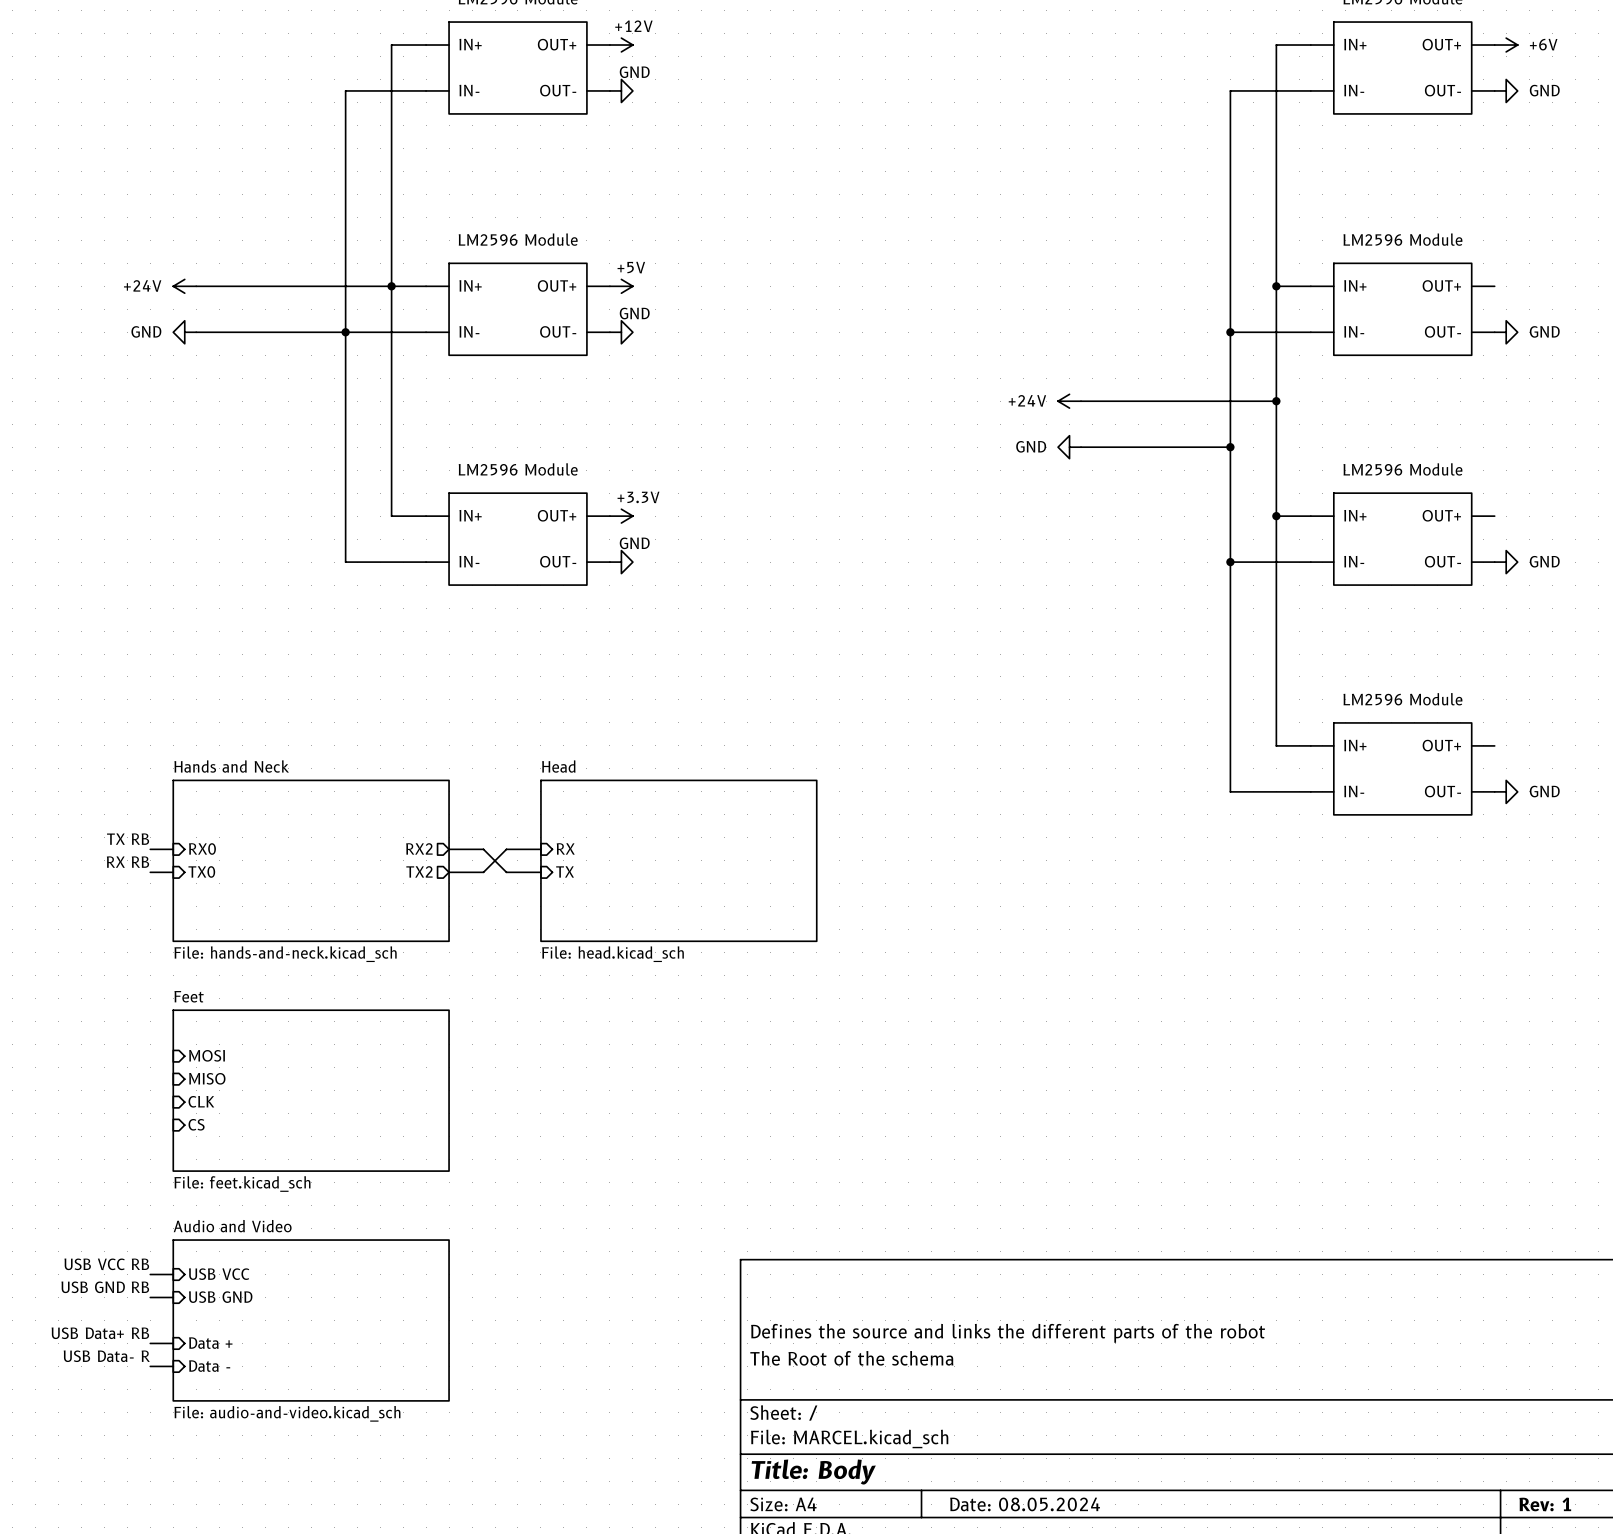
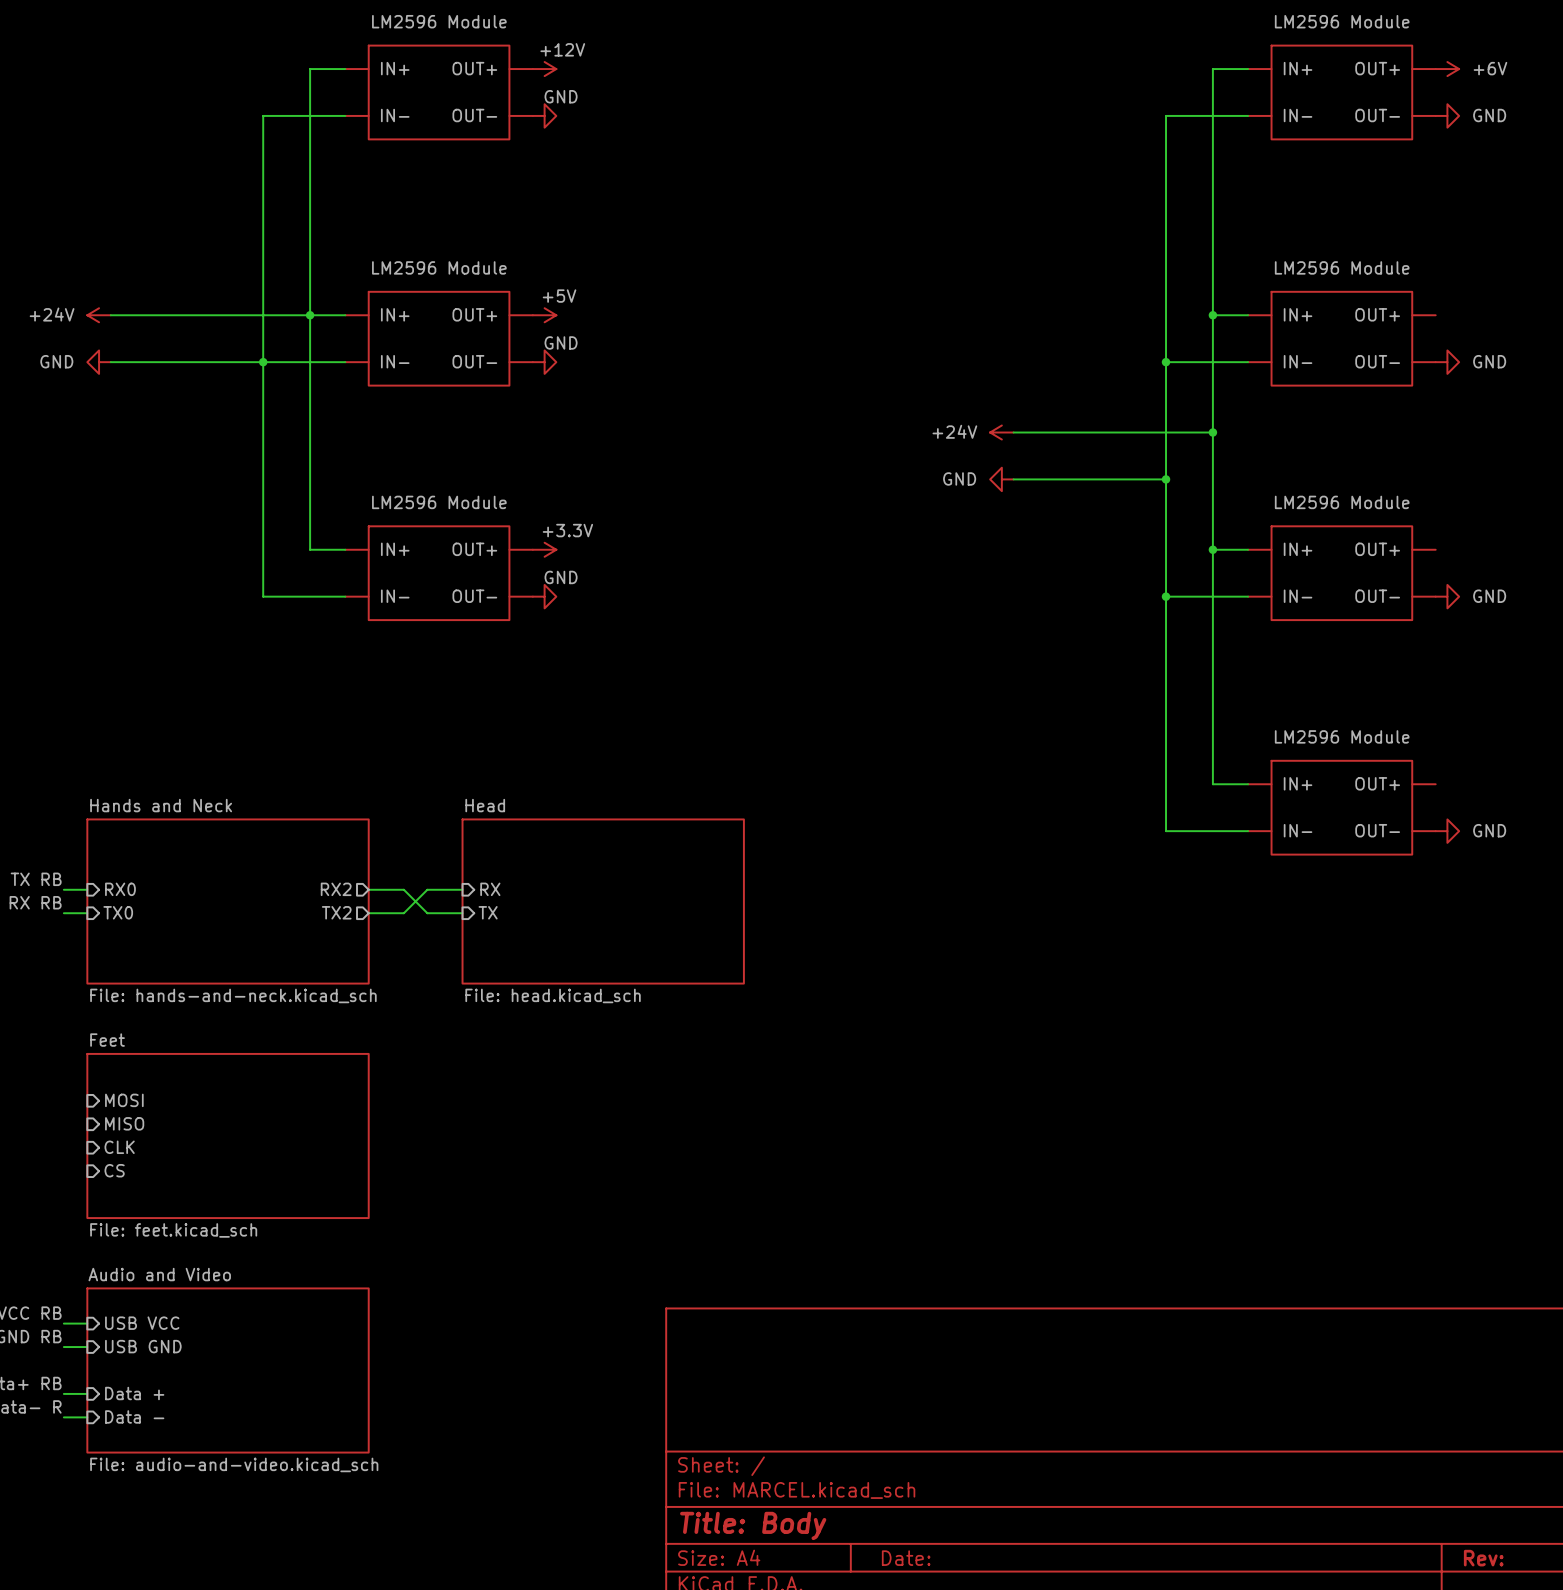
title block: Defines the source and links the different parts of the robot (1008, 1333) -> none
title block: The Root of the schema (851, 1358) -> none
title block: Date: 08.05.2024 (1025, 1504) -> Date: (906, 1558)
title block: Rev: 1 (1545, 1504) -> Rev: (1483, 1558)

